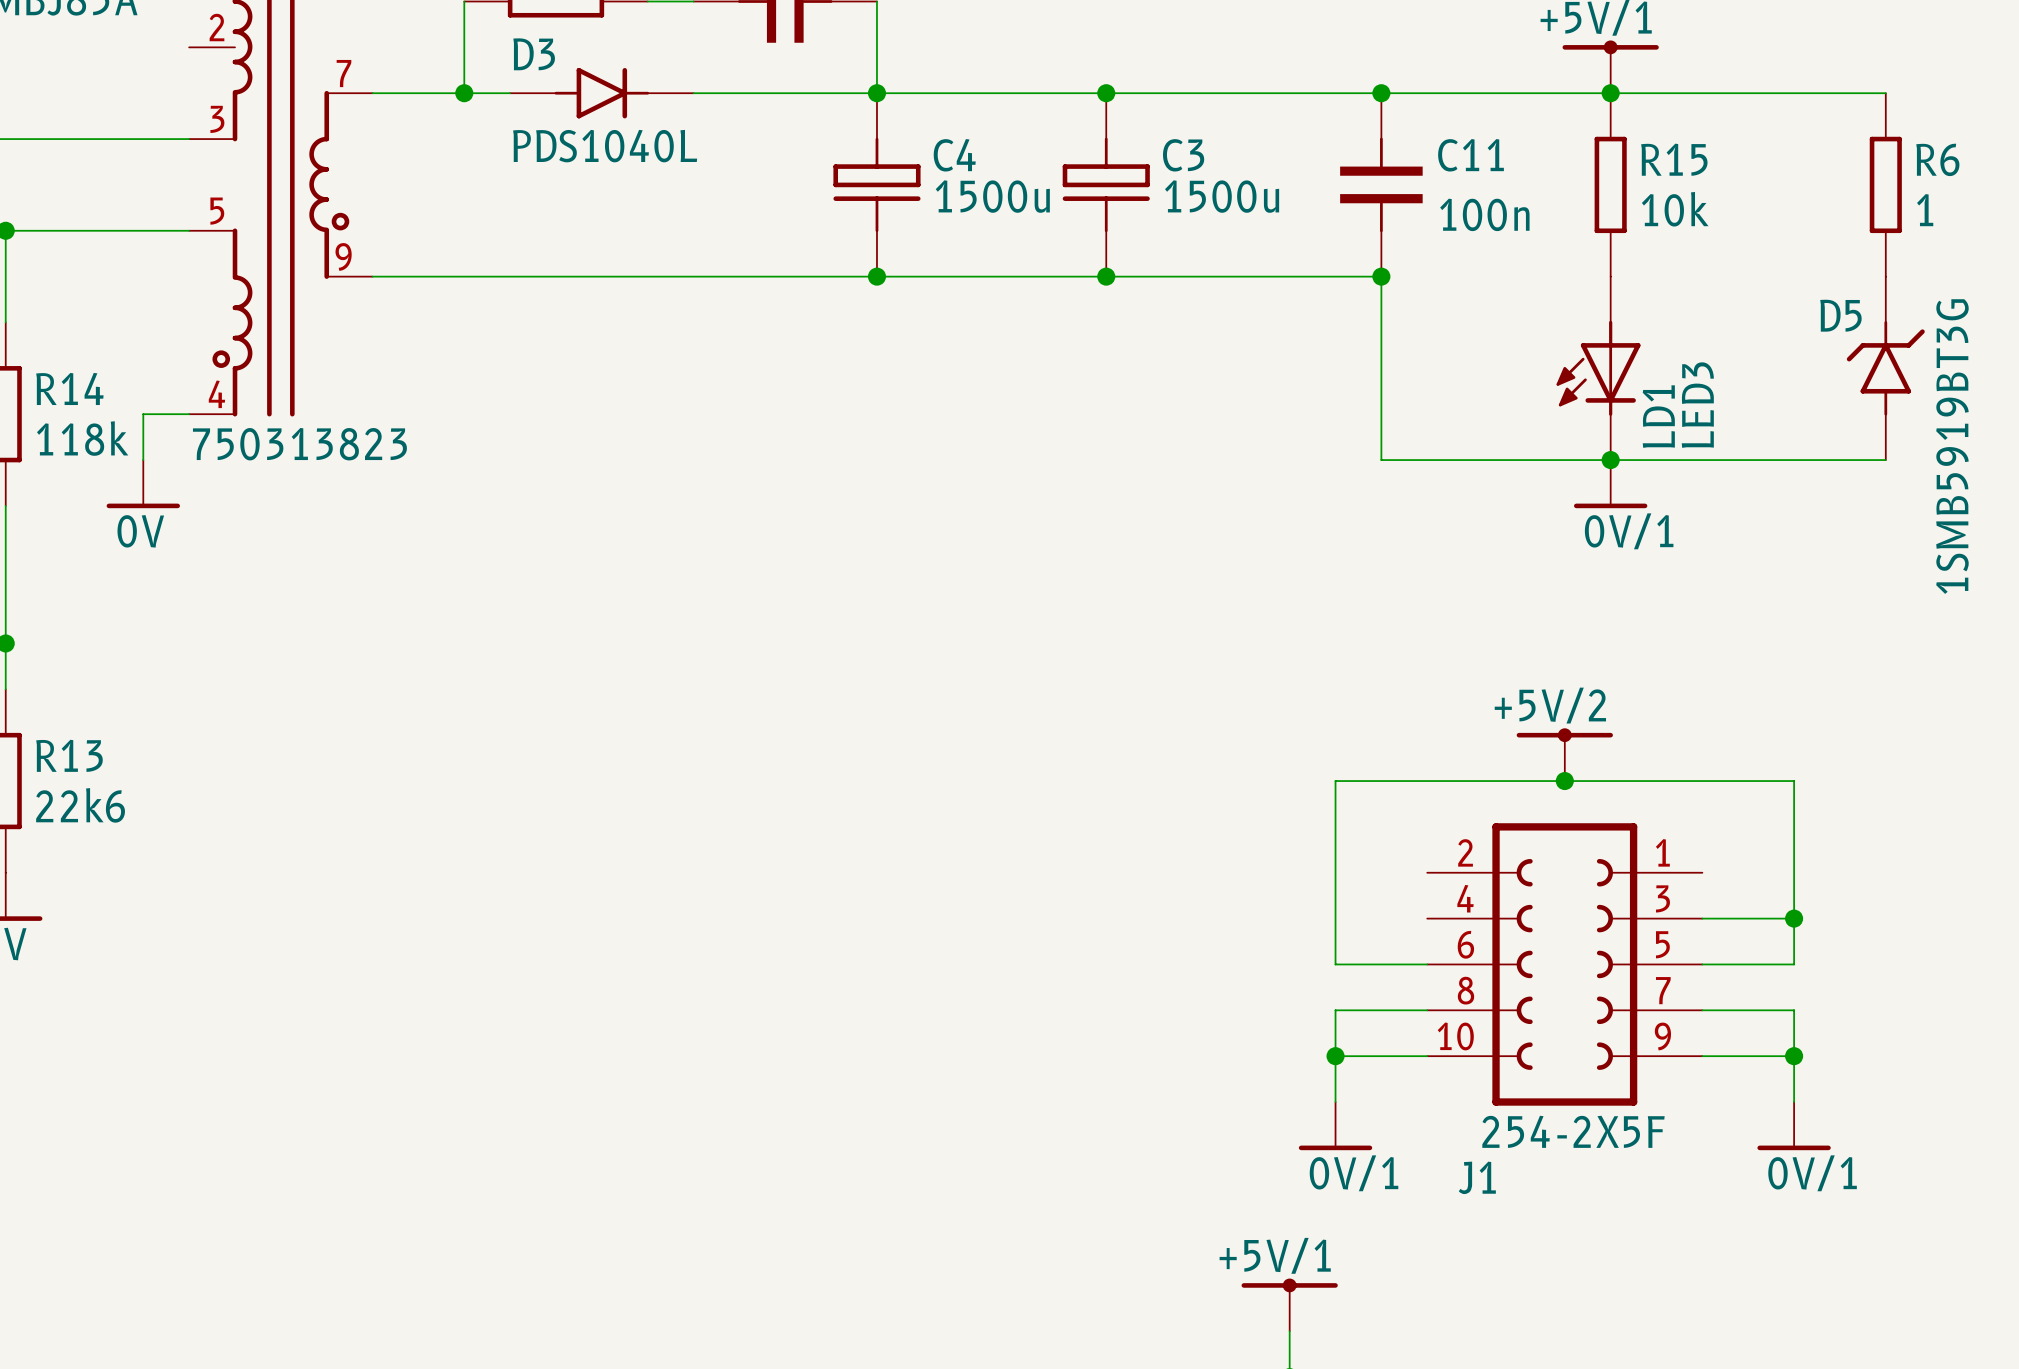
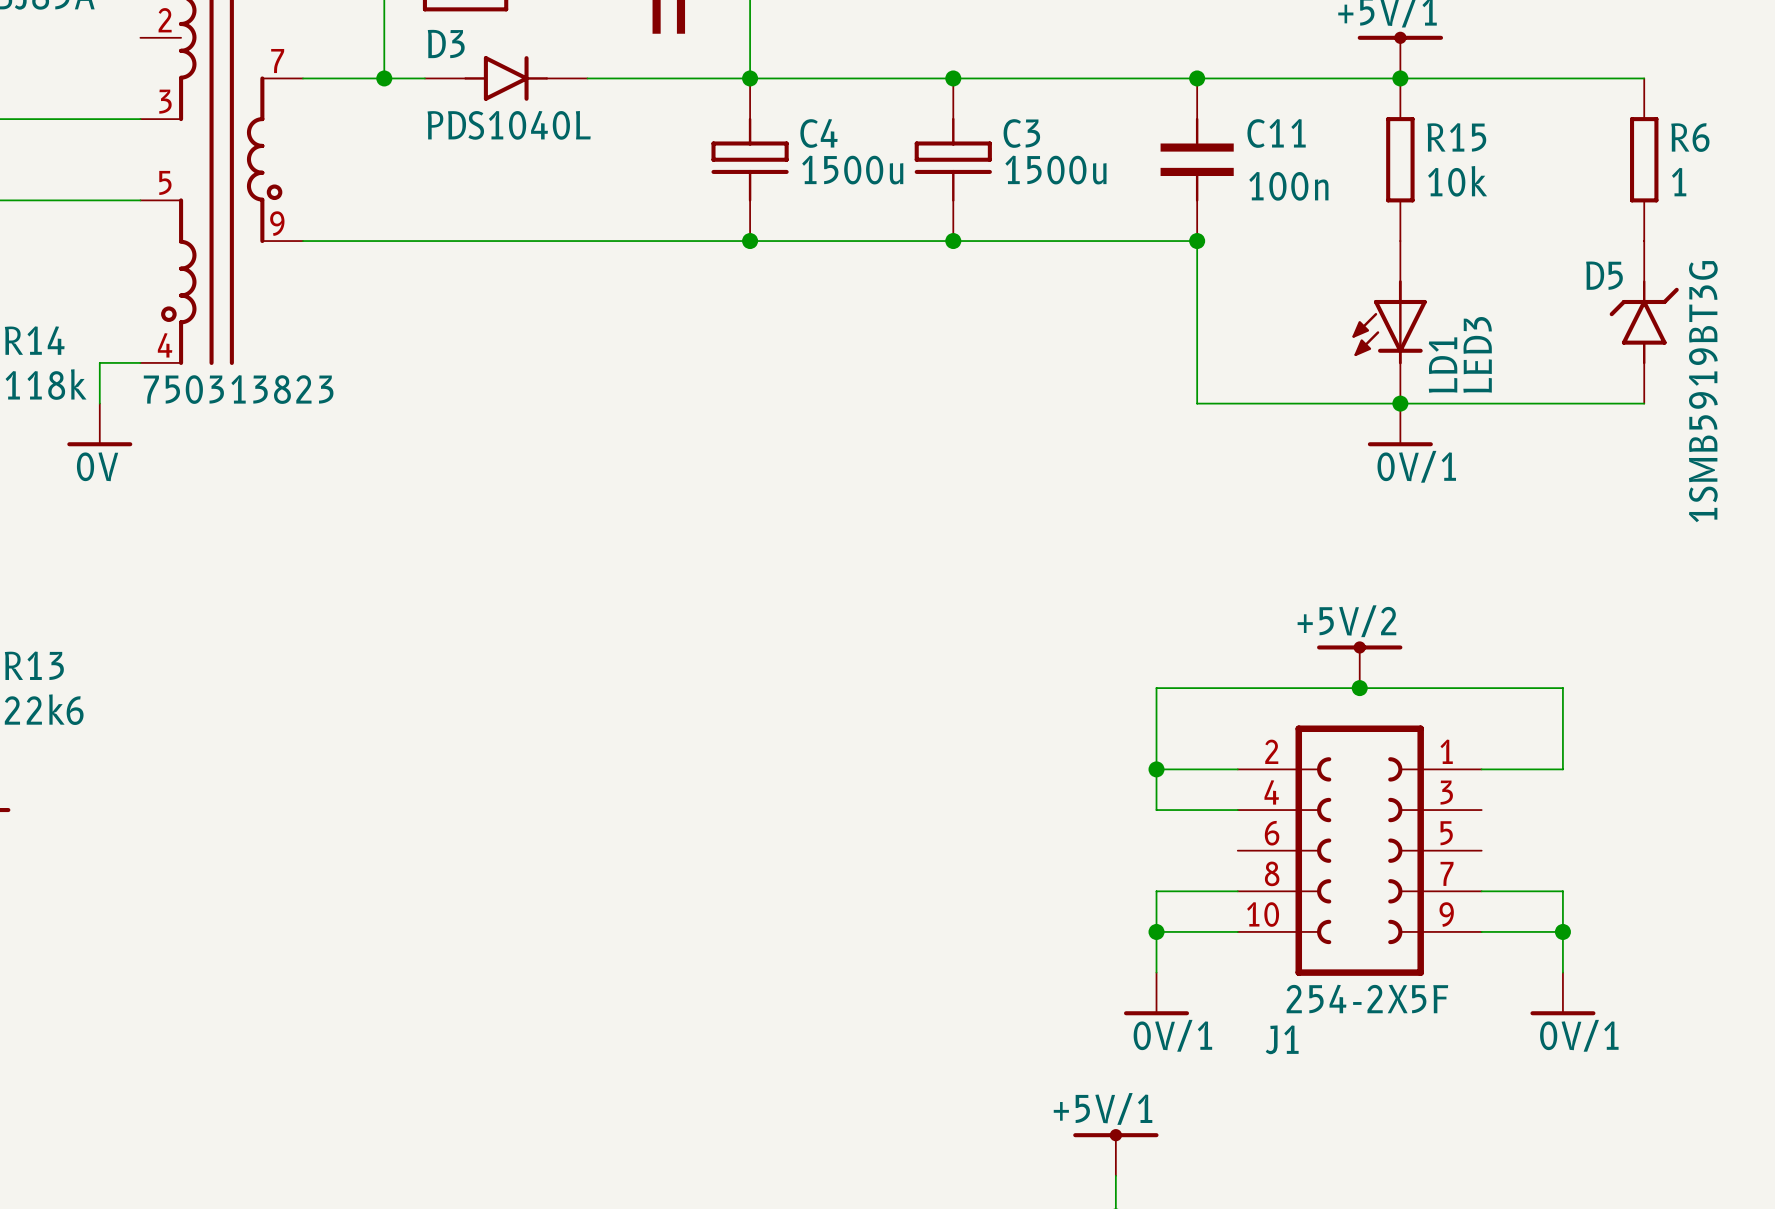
junction: none -> (1156, 769)
wire: (1794, 872) (1794, 964) (1702, 964) -> (1562, 769) (1481, 769)
wire: (1335, 918) (1335, 964) (1427, 964) -> (1156, 810) (1237, 810)
wire: (1702, 918) (1794, 918) -> (1156, 769) (1237, 769)
junction: (1794, 918) -> none

